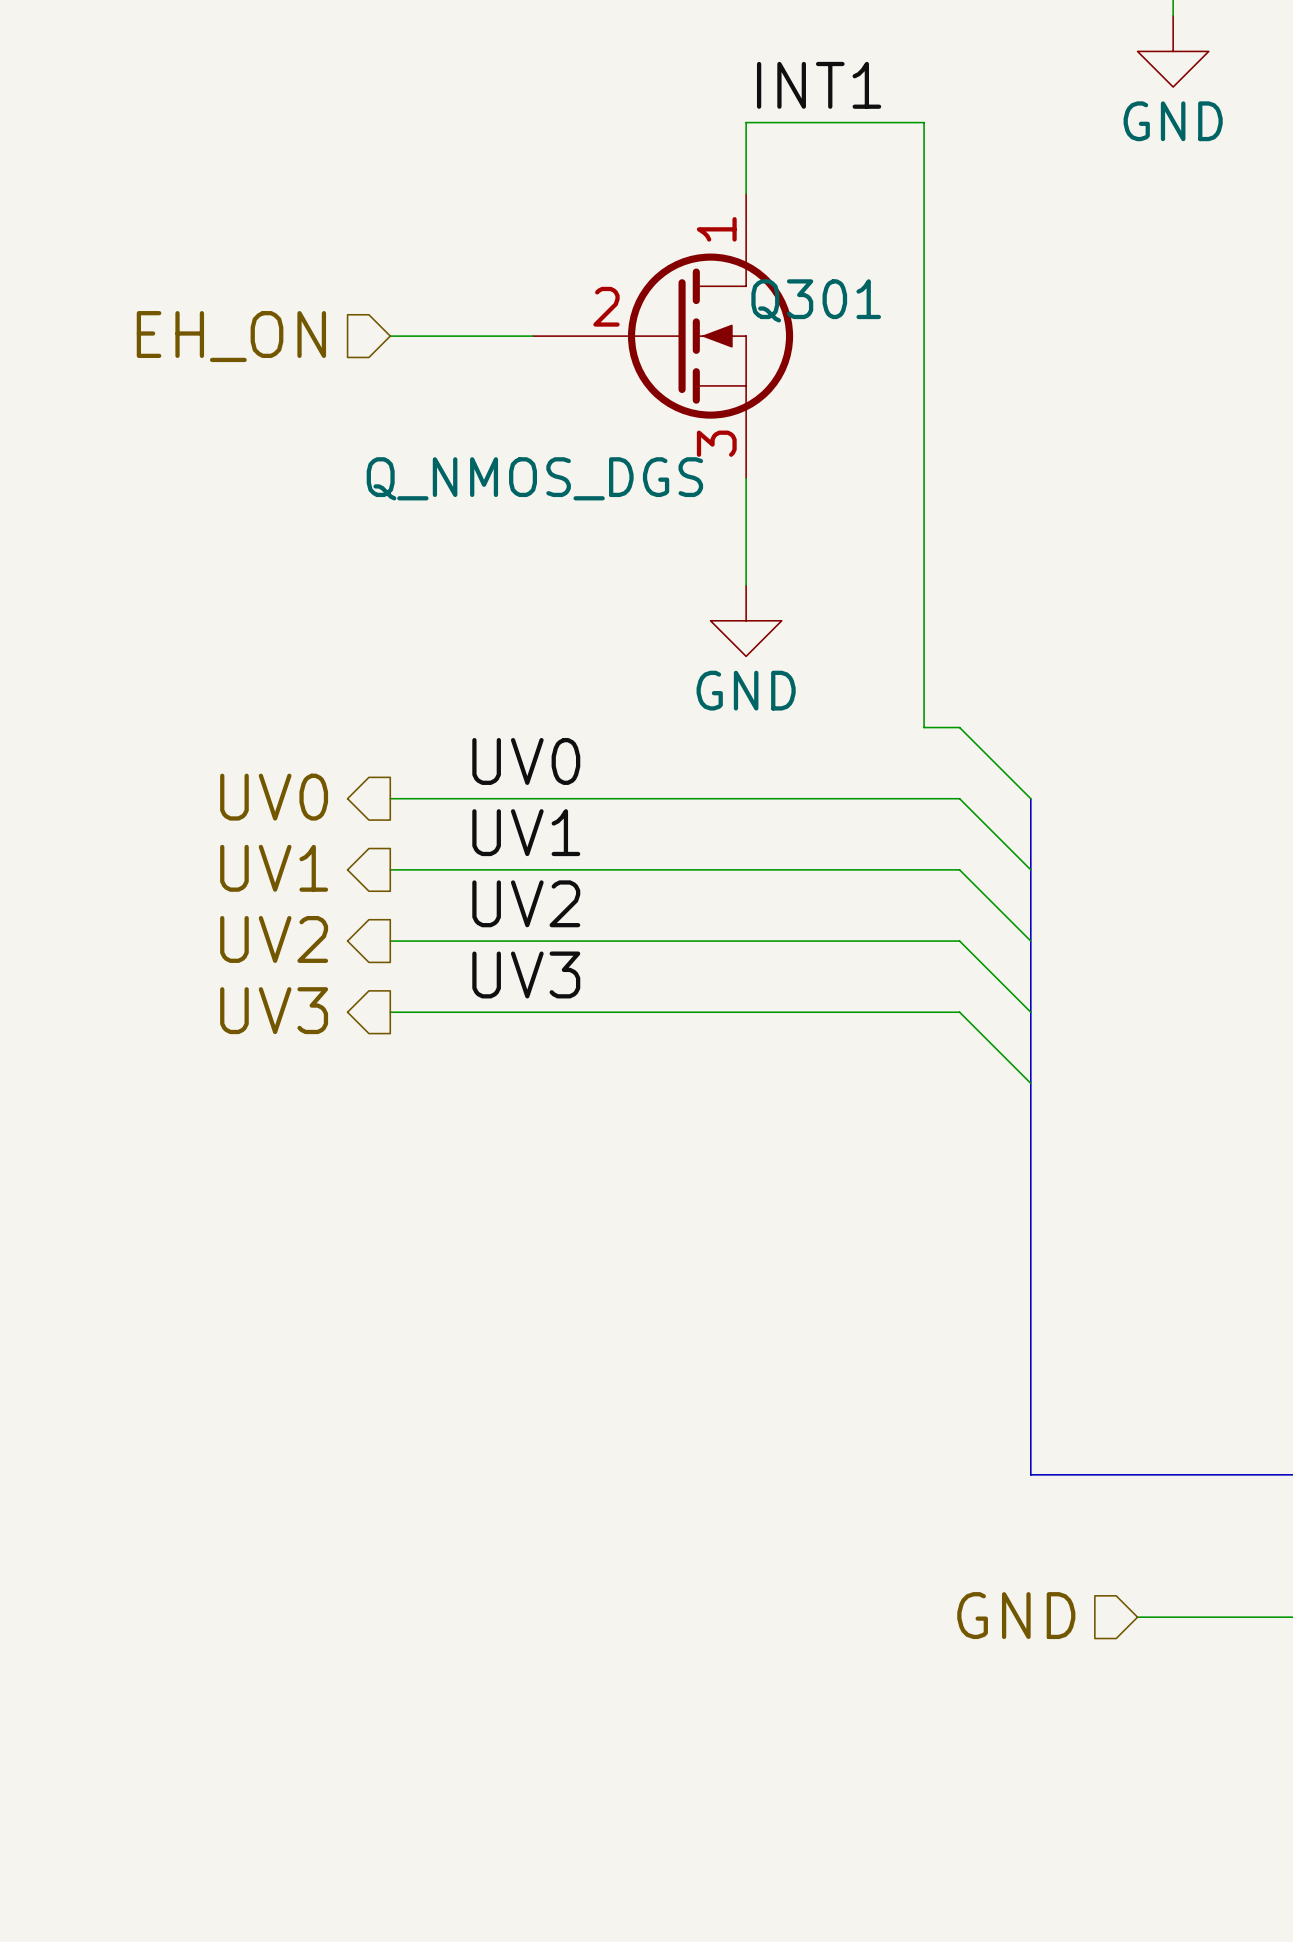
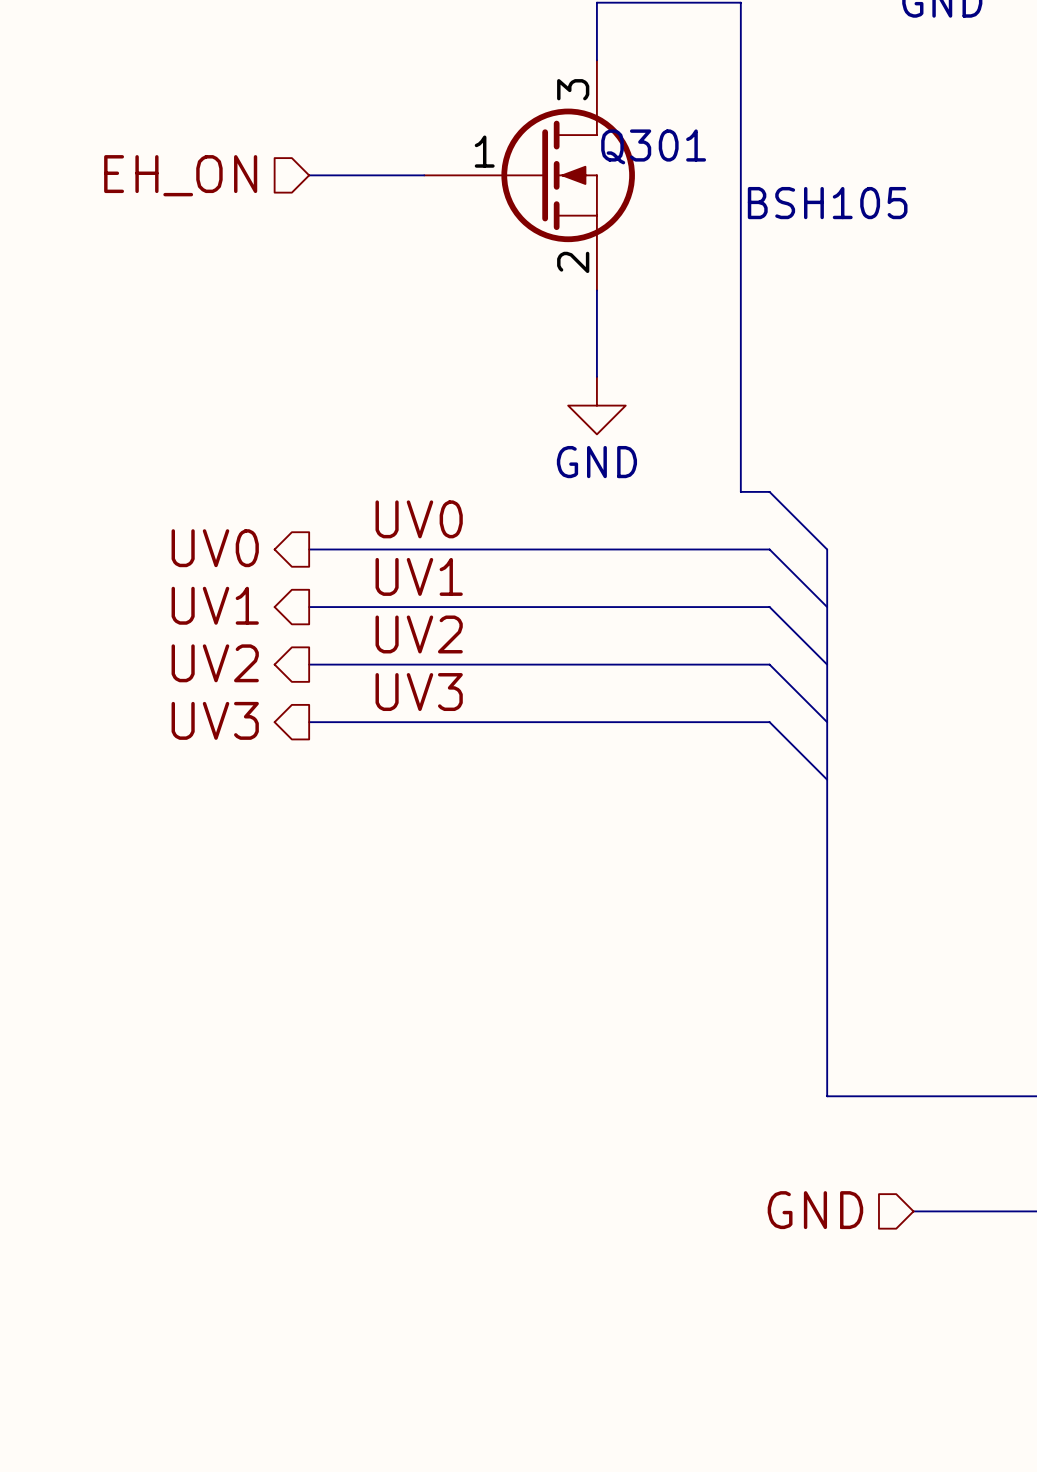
Q301 pin number: 1 (716, 229) -> 3 (573, 89)
Q301 pin number: 2 (606, 306) -> 1 (484, 151)
Q301 pin number: 3 (716, 443) -> 2 (573, 262)
Q301 value: Q_NMOS_DGS (534, 478) -> BSH105 (827, 203)

